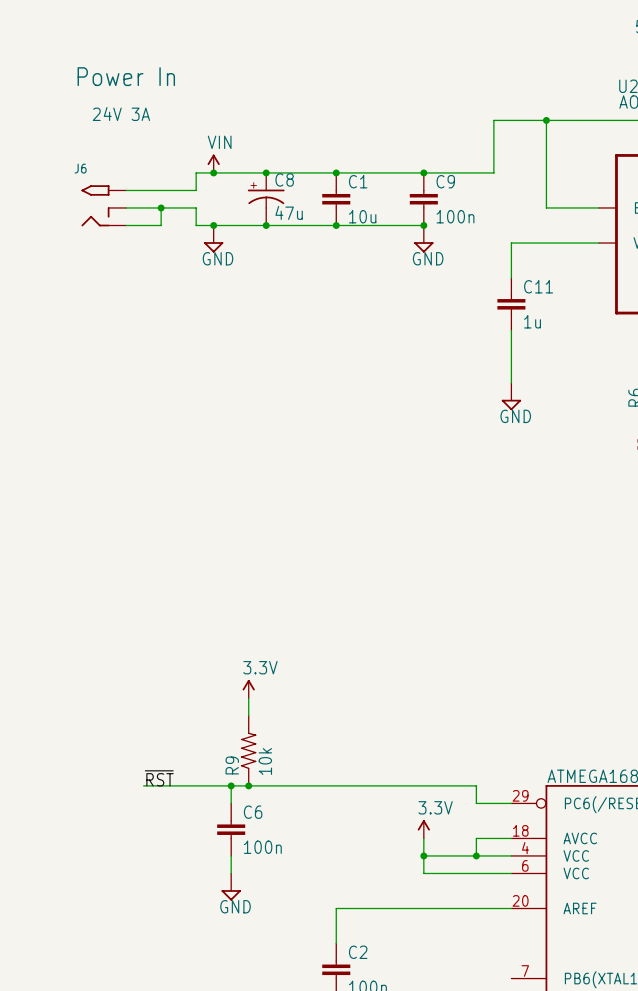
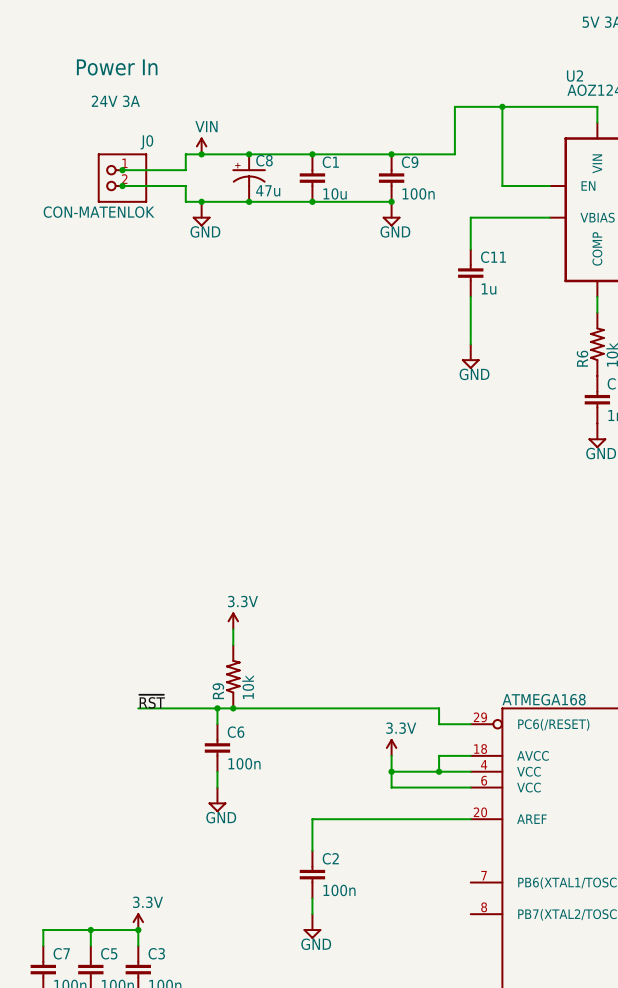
junction: none -> (122, 170)
J0: none -> CON-MATENLOK (122, 178)
J6: (103, 205) -> none
junction: none -> (122, 186)
wire: (161, 207) (161, 225) (126, 225) -> none
junction: (161, 207) -> none

